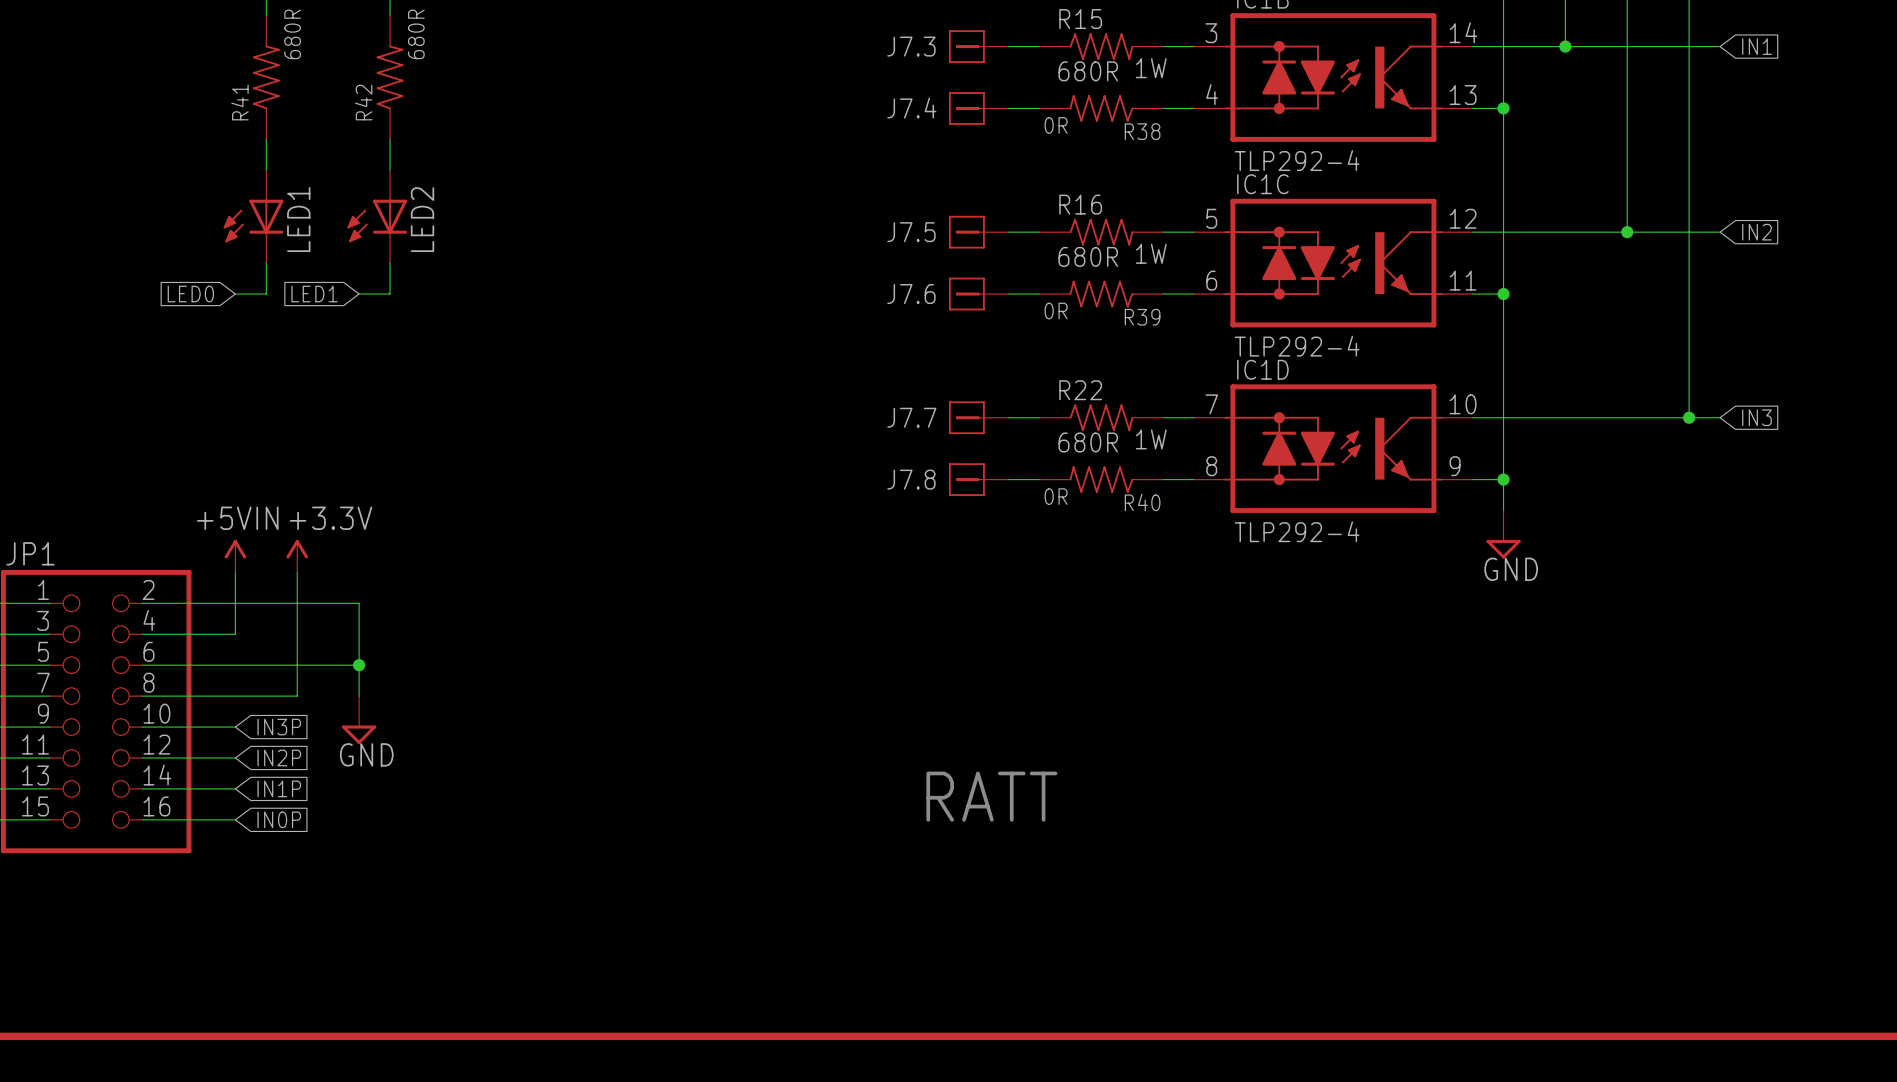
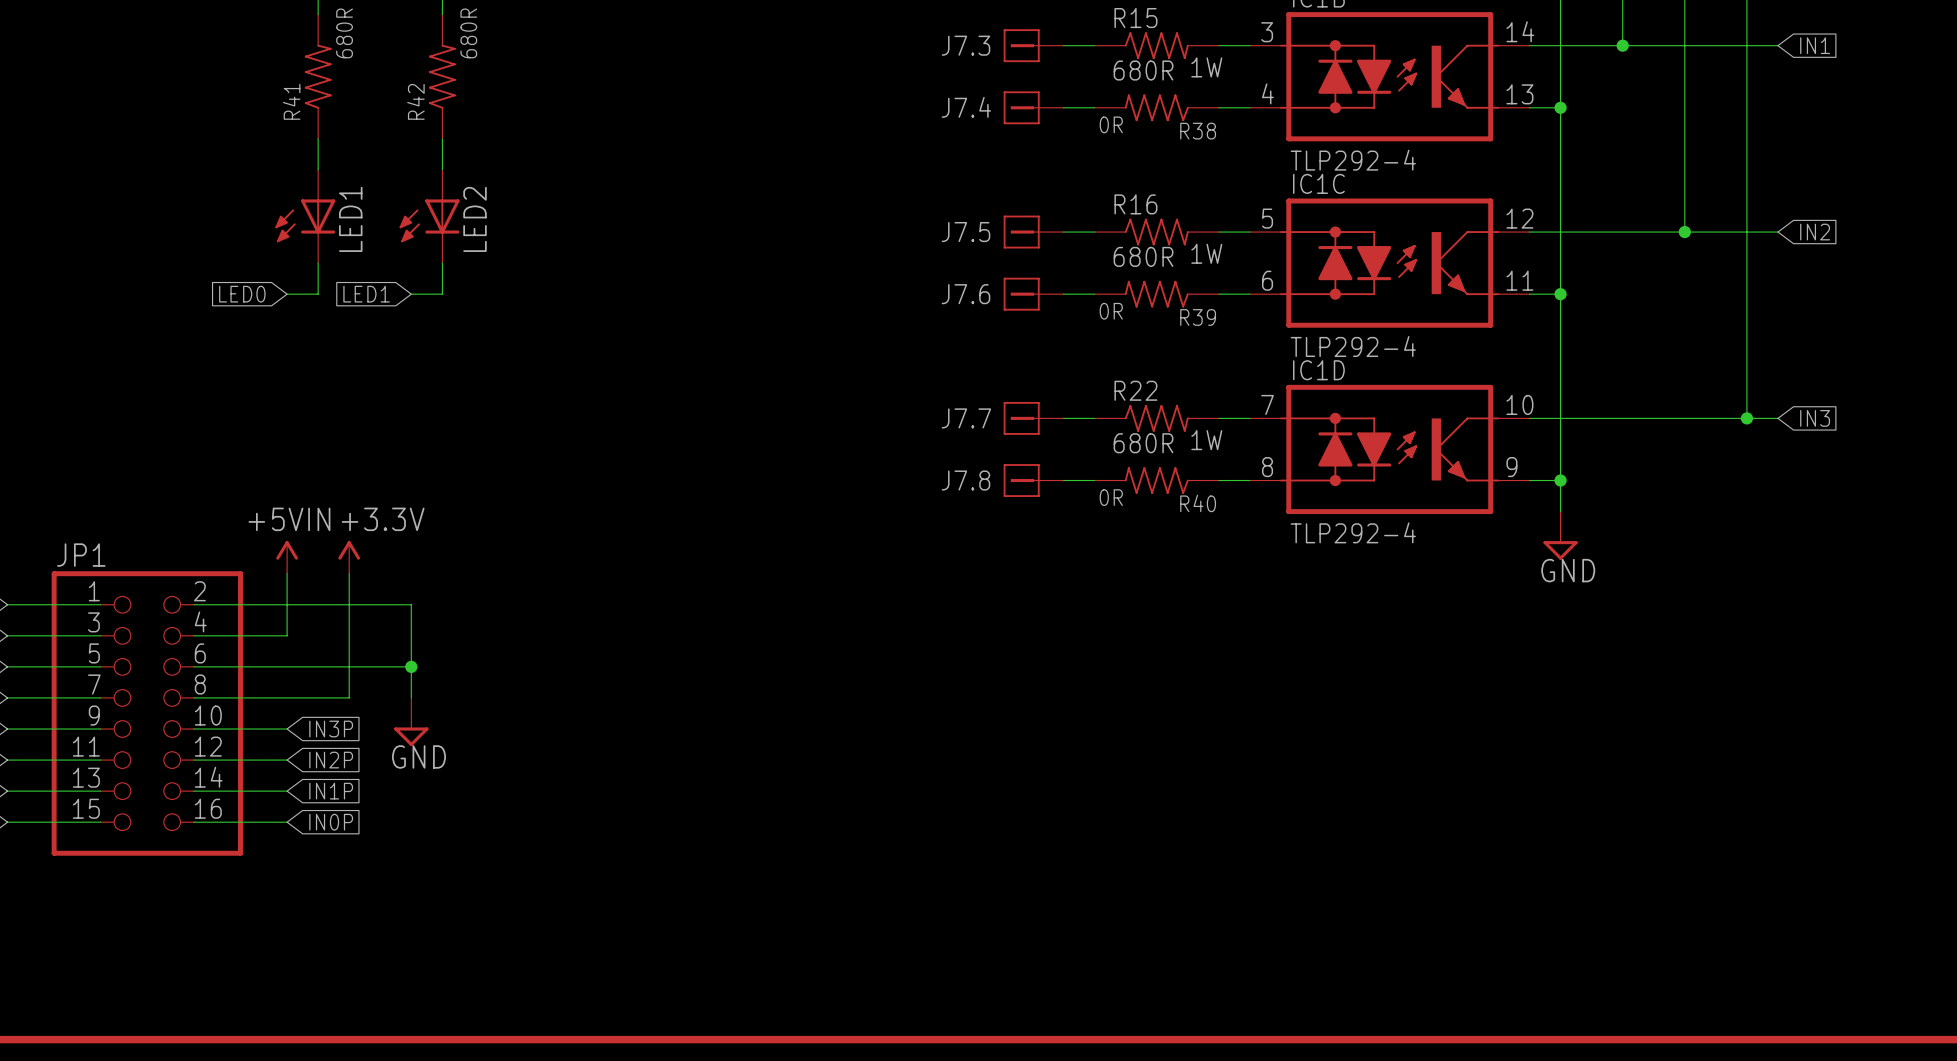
text: RATT (991, 796) -> none

